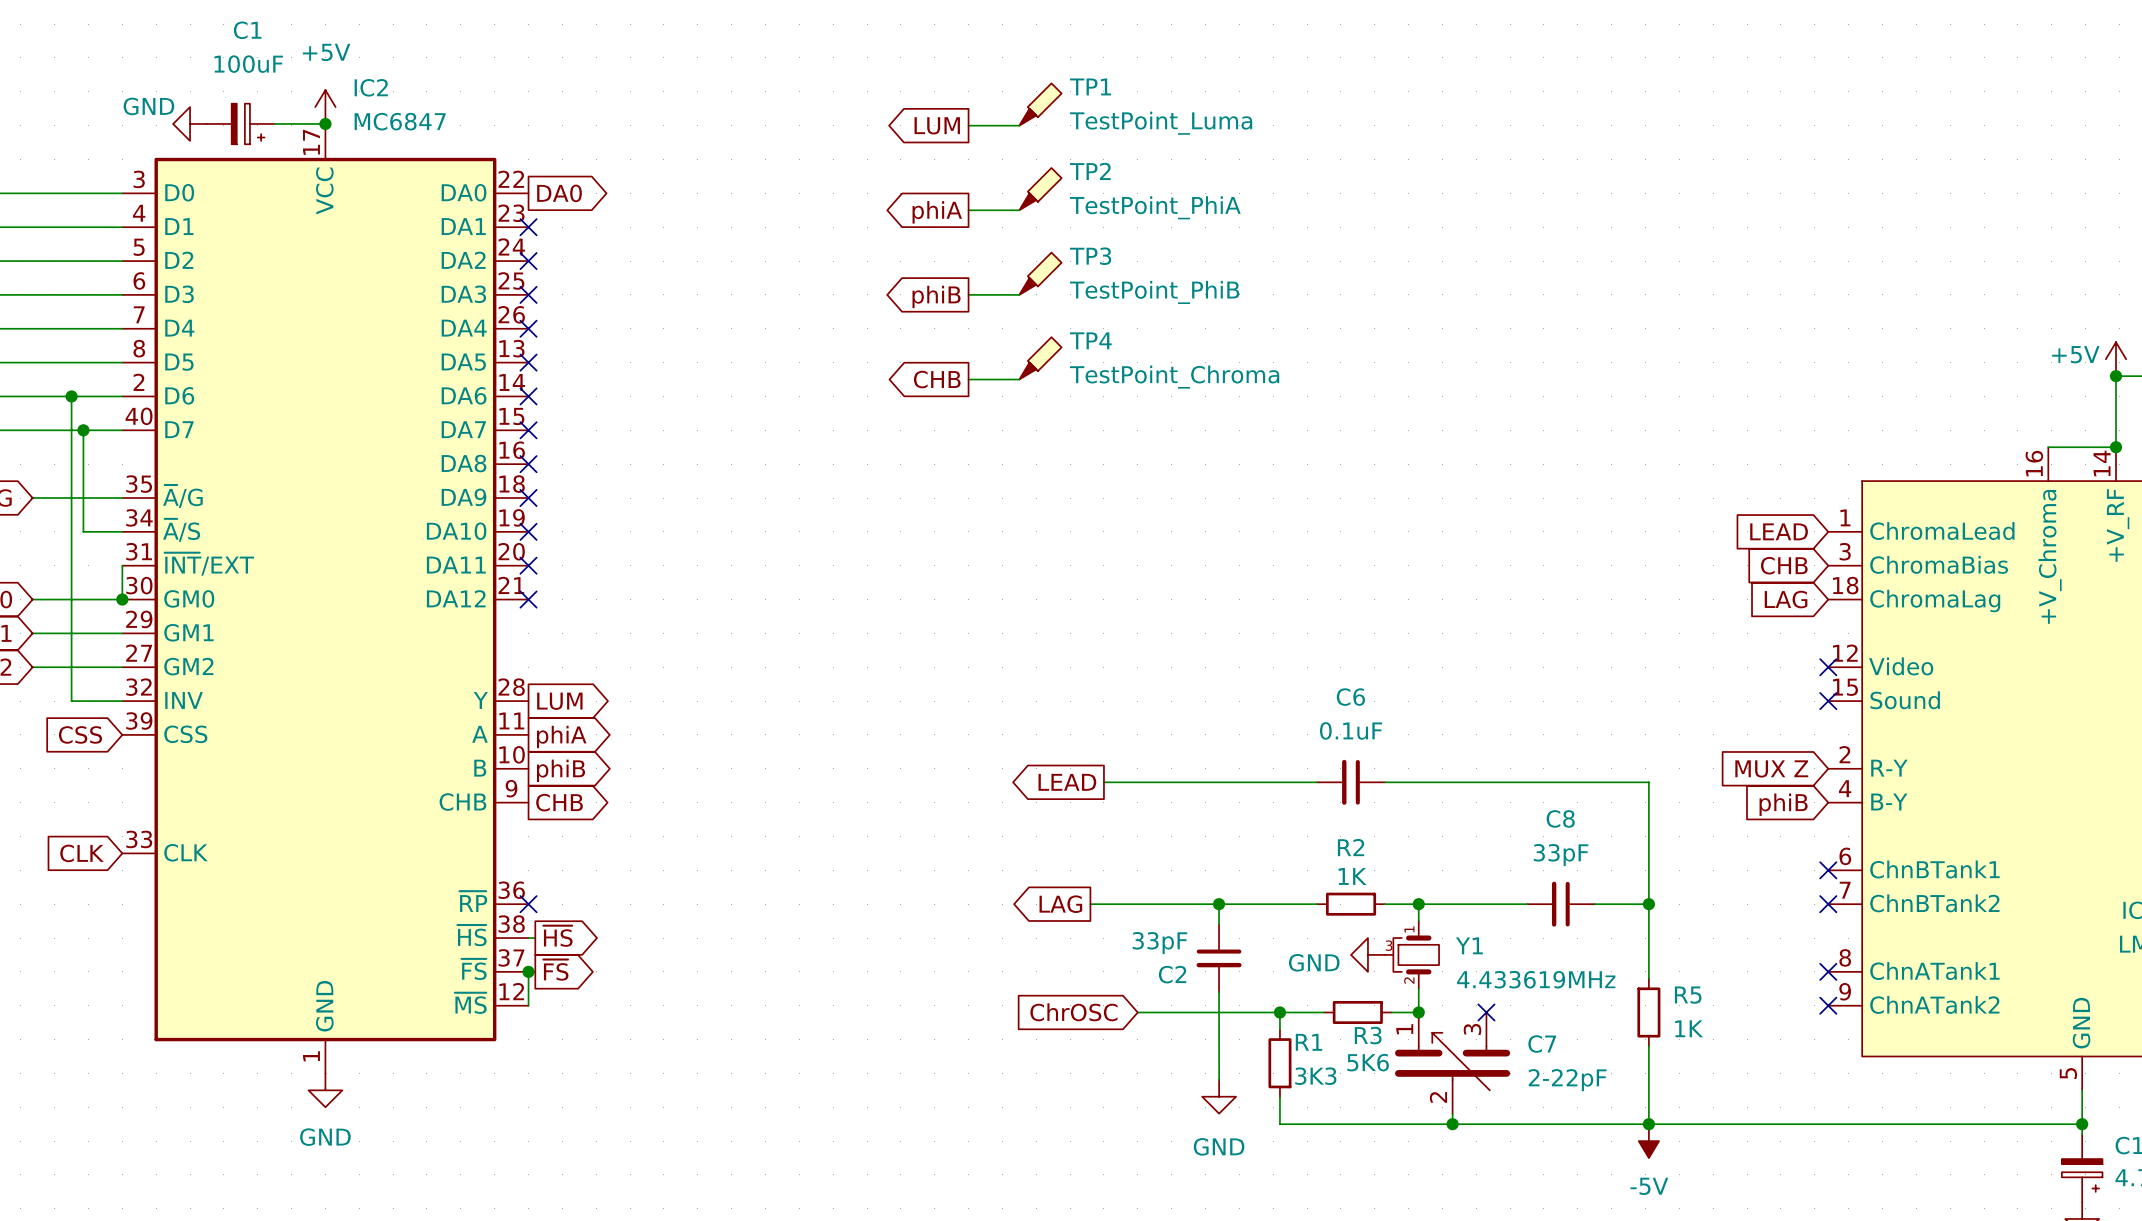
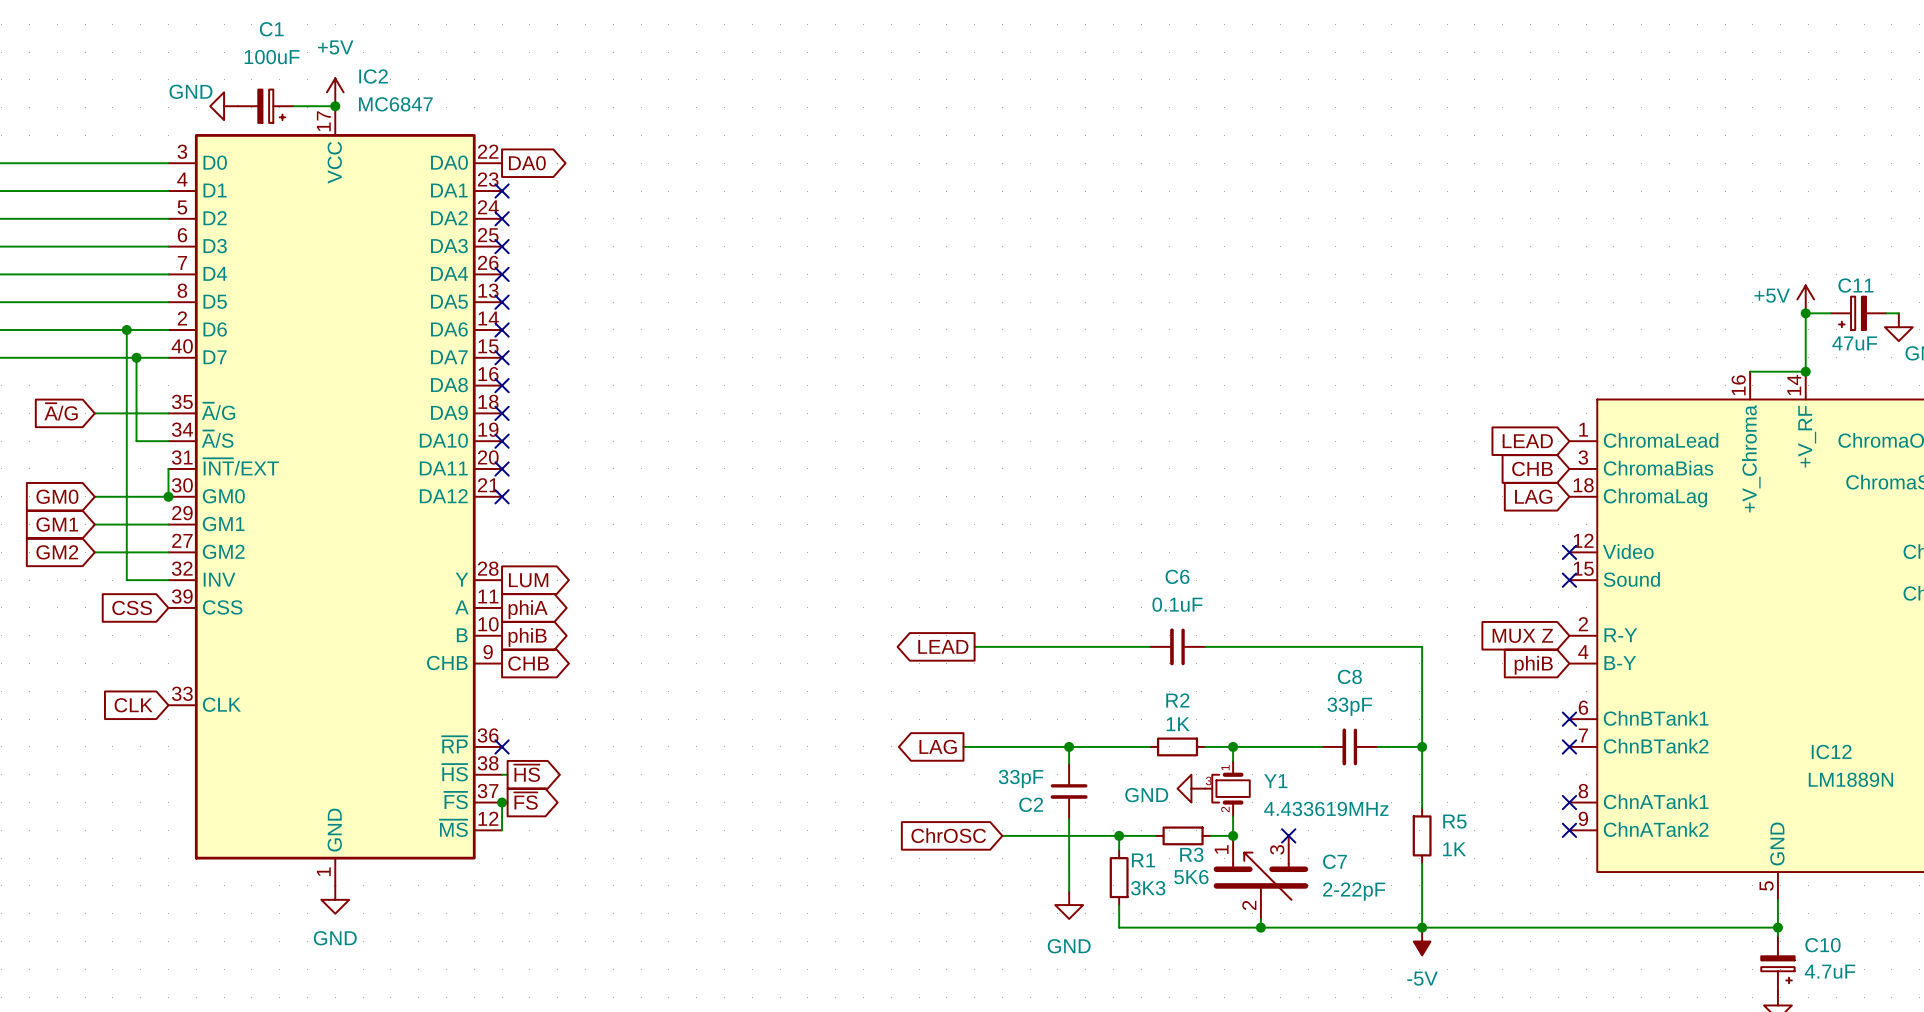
TP1: TestPoint_Luma (1040, 104) -> none
global label: LUM (937, 125) -> none
wire: (968, 125) (1019, 125) -> none
TP2: TestPoint_PhiA (1040, 189) -> none
wire: (968, 210) (1019, 210) -> none
global label: phiA (937, 212) -> none
TP3: TestPoint_PhiB (1040, 273) -> none
wire: (968, 294) (1019, 294) -> none
global label: phiB (936, 296) -> none
TP4: TestPoint_Chroma (1040, 358) -> none
global label: CHB (937, 379) -> none
wire: (968, 379) (1019, 379) -> none

